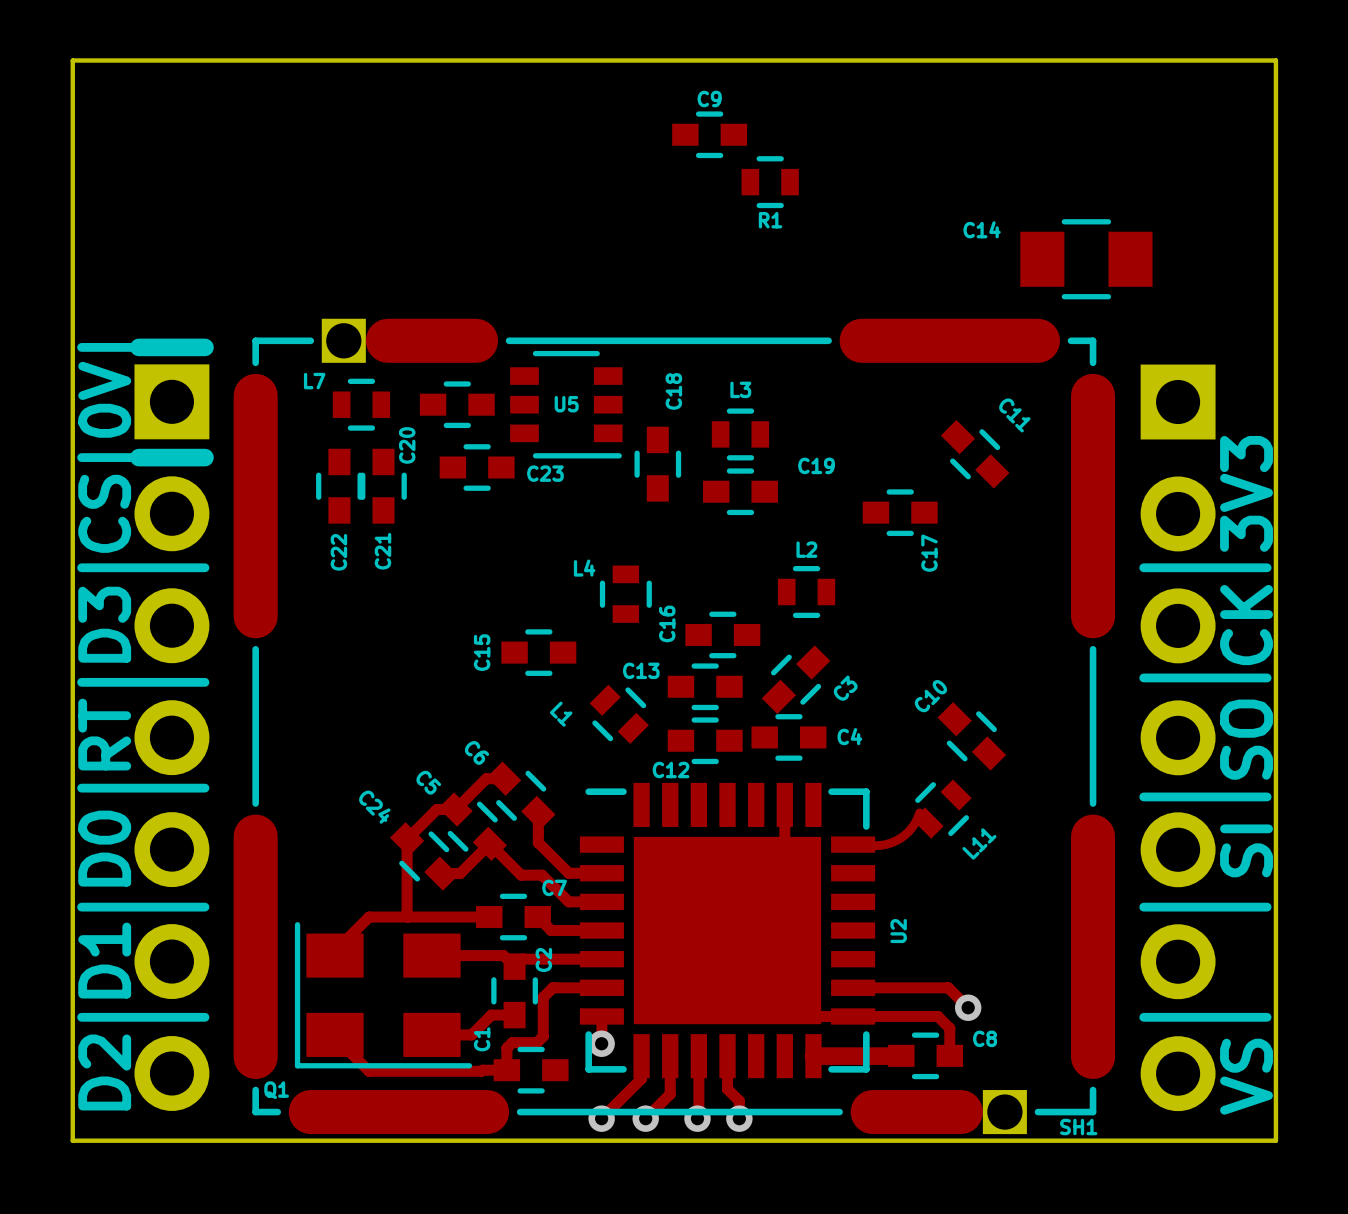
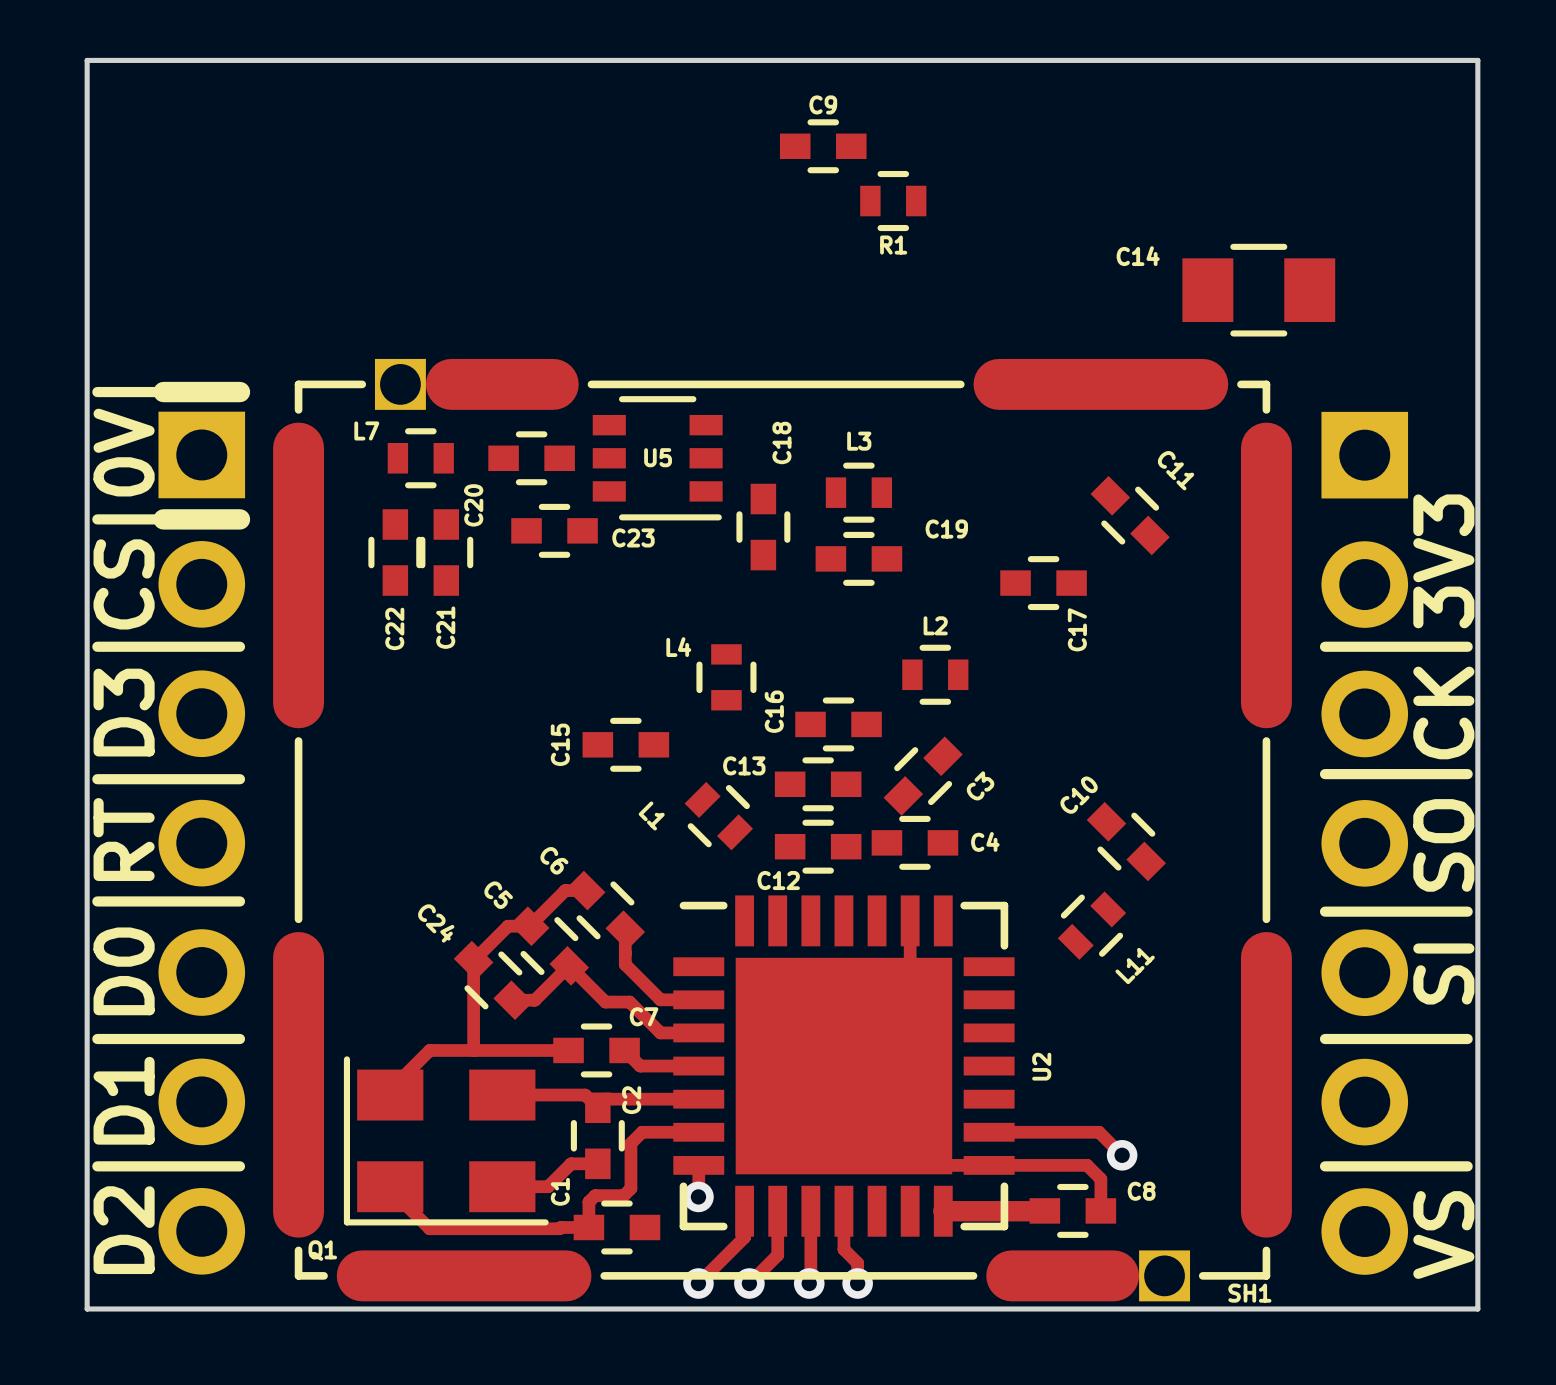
track: (919, 812) (912, 827) (900, 838) (886, 844) (870, 845) -> none

